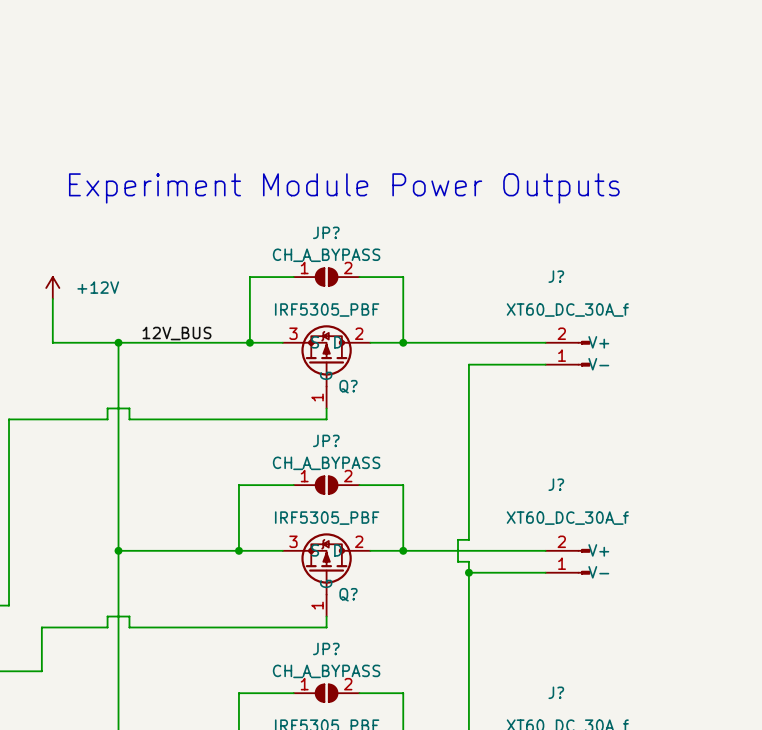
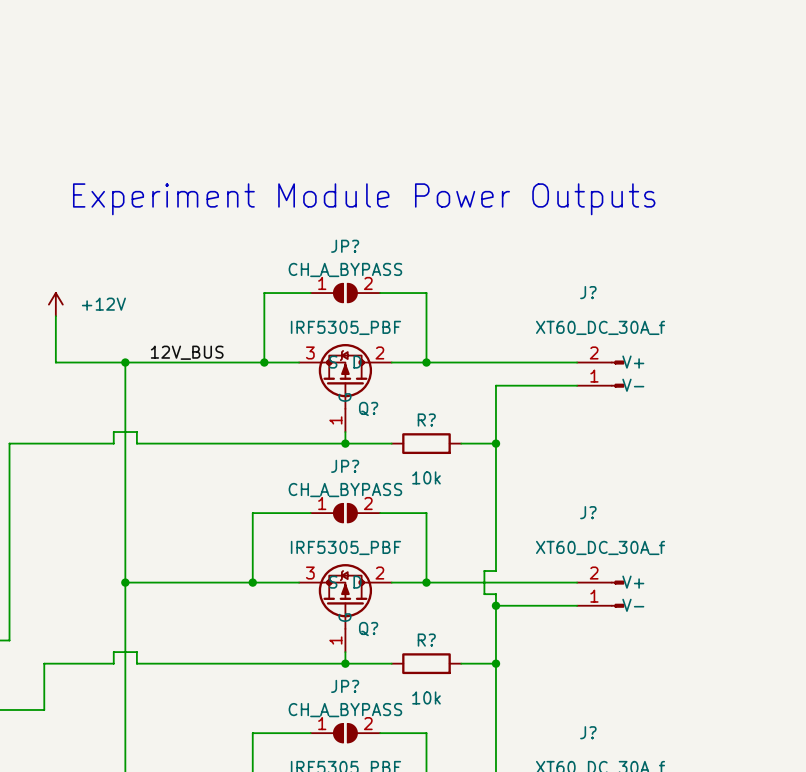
wire: none -> (345, 443) (391, 443)
junction: none -> (345, 443)
R?: none -> 10k (426, 443)
wire: none -> (461, 443) (495, 443)
junction: none -> (495, 443)
wire: none -> (345, 663) (391, 663)
junction: none -> (345, 663)
R?: none -> 10k (426, 663)
wire: none -> (461, 663) (495, 663)
junction: none -> (495, 663)

